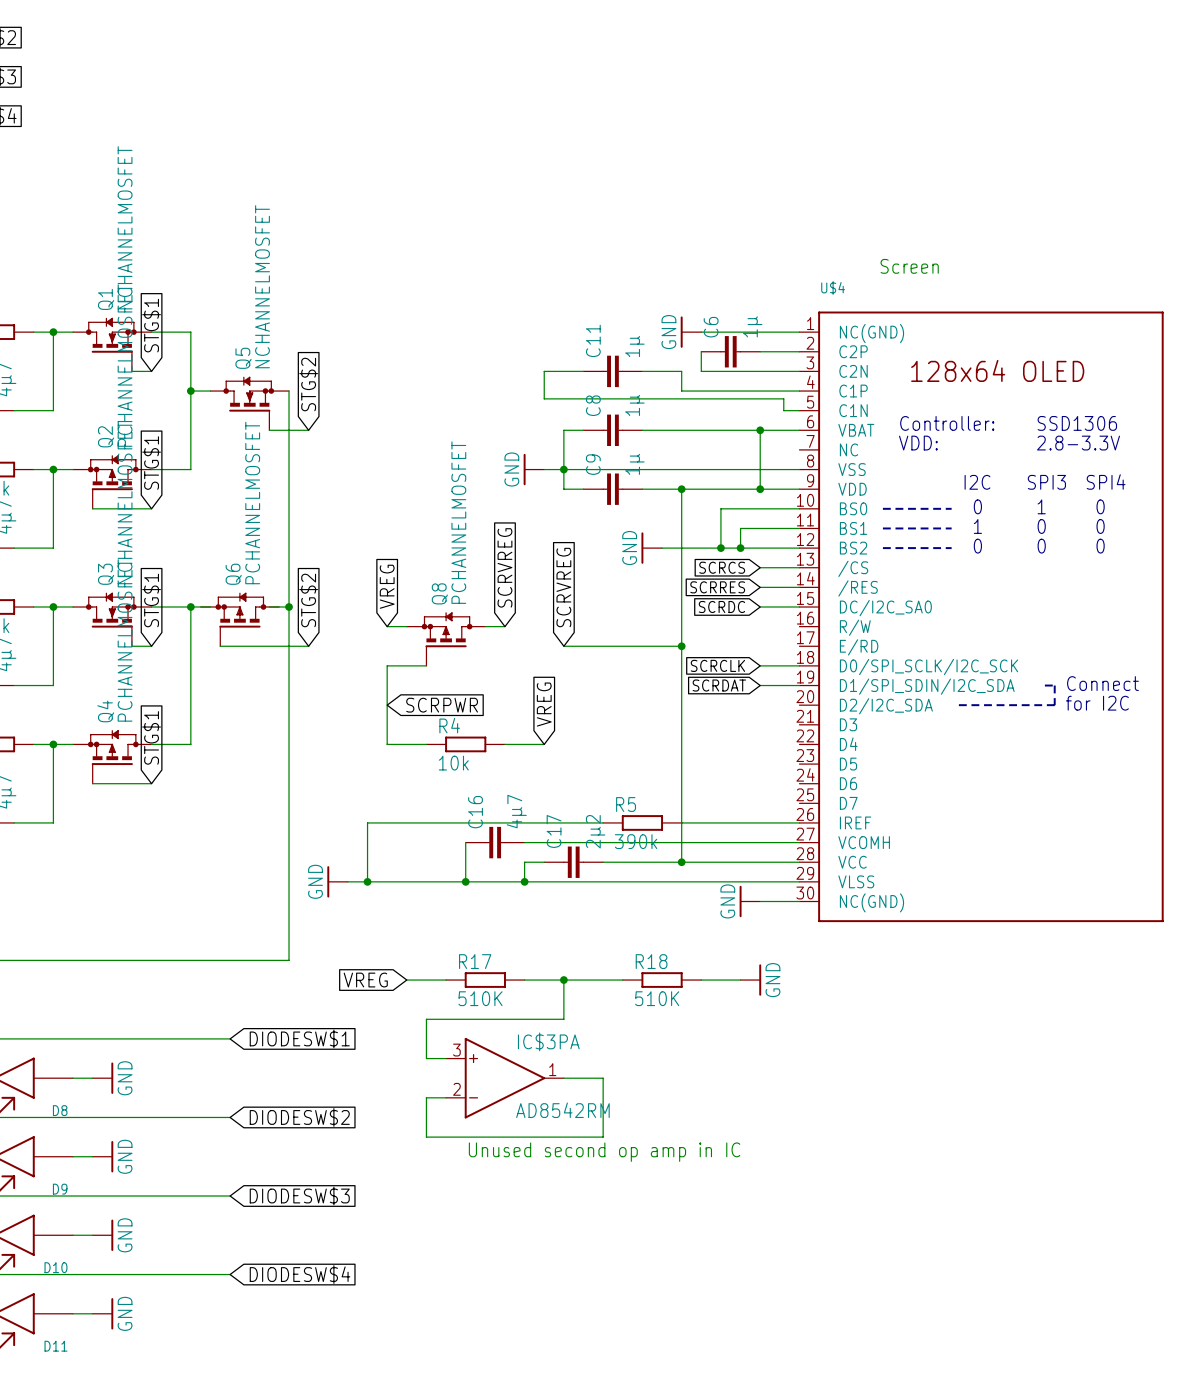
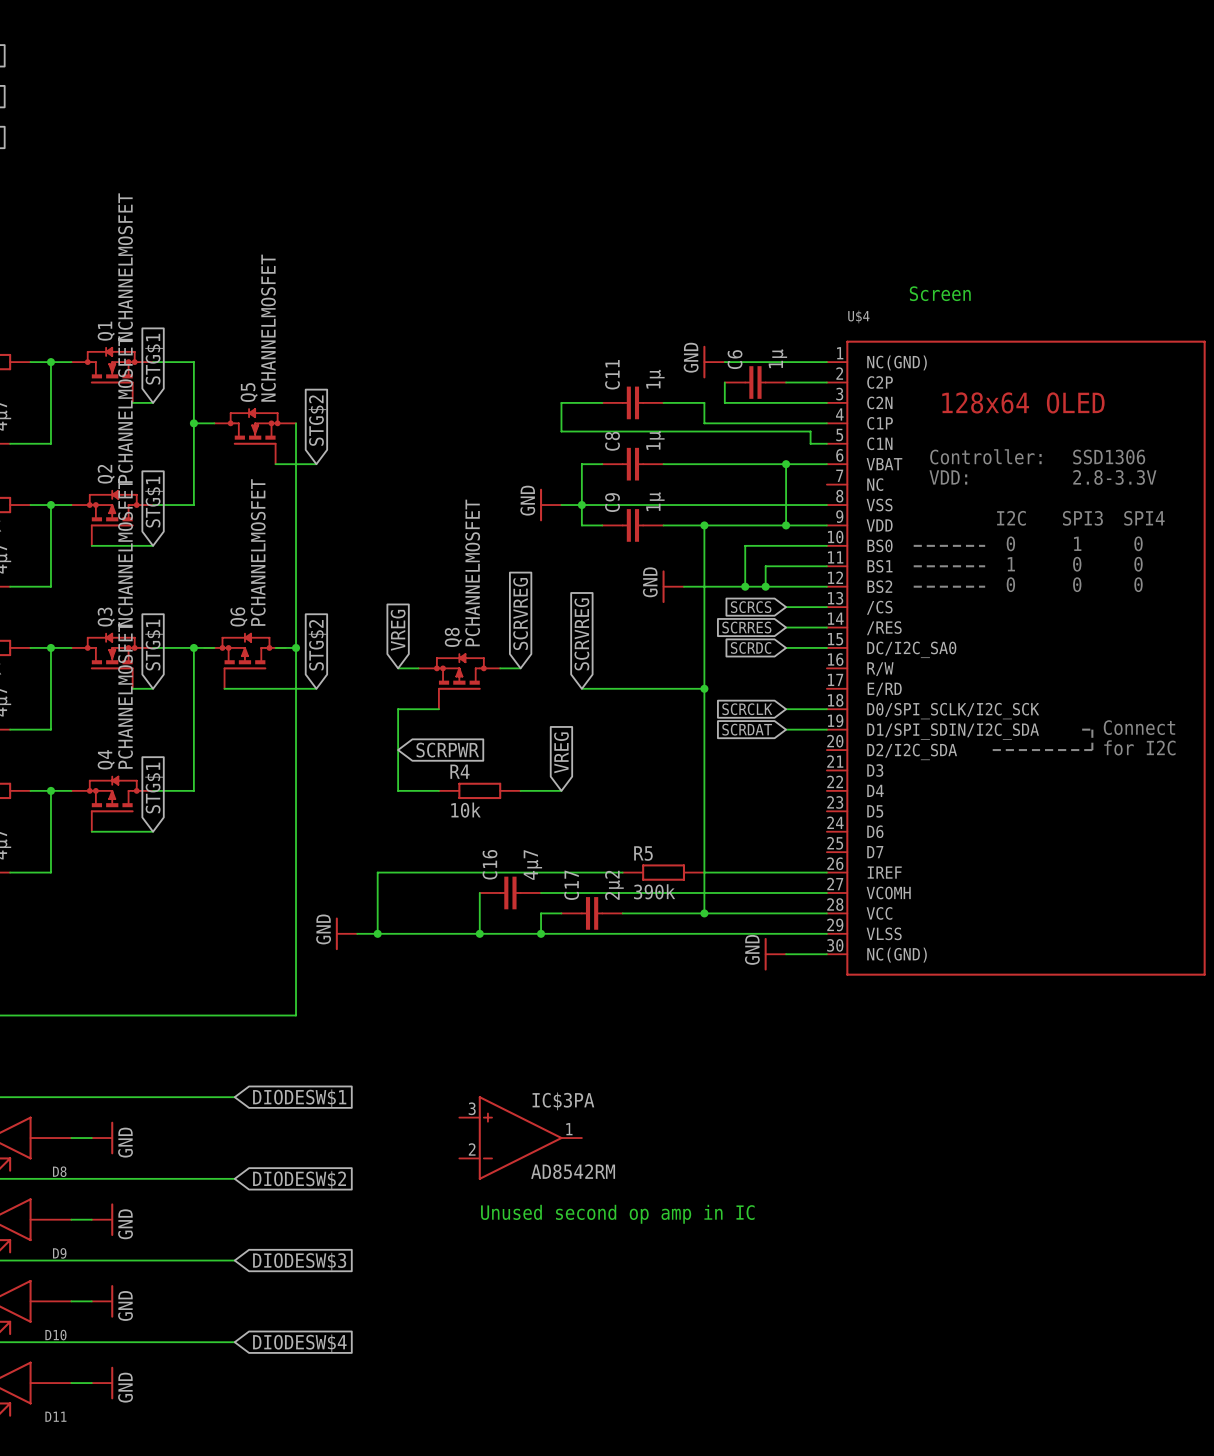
global label: VREG (365, 980) -> none
wire: (406, 980) (446, 980) -> none
R17: 510K (485, 980) -> none
wire: (524, 980) (622, 980) -> none
wire: (563, 980) (563, 1019) (426, 1019) (426, 1058) (446, 1058) -> none
junction: (563, 980) -> none
R18: 510K (662, 980) -> none
wire: (701, 980) (740, 980) -> none
power symbol: GND (750, 980) -> none
wire: (563, 1078) (603, 1078) (603, 1137) (426, 1137) (426, 1097) (446, 1097) -> none

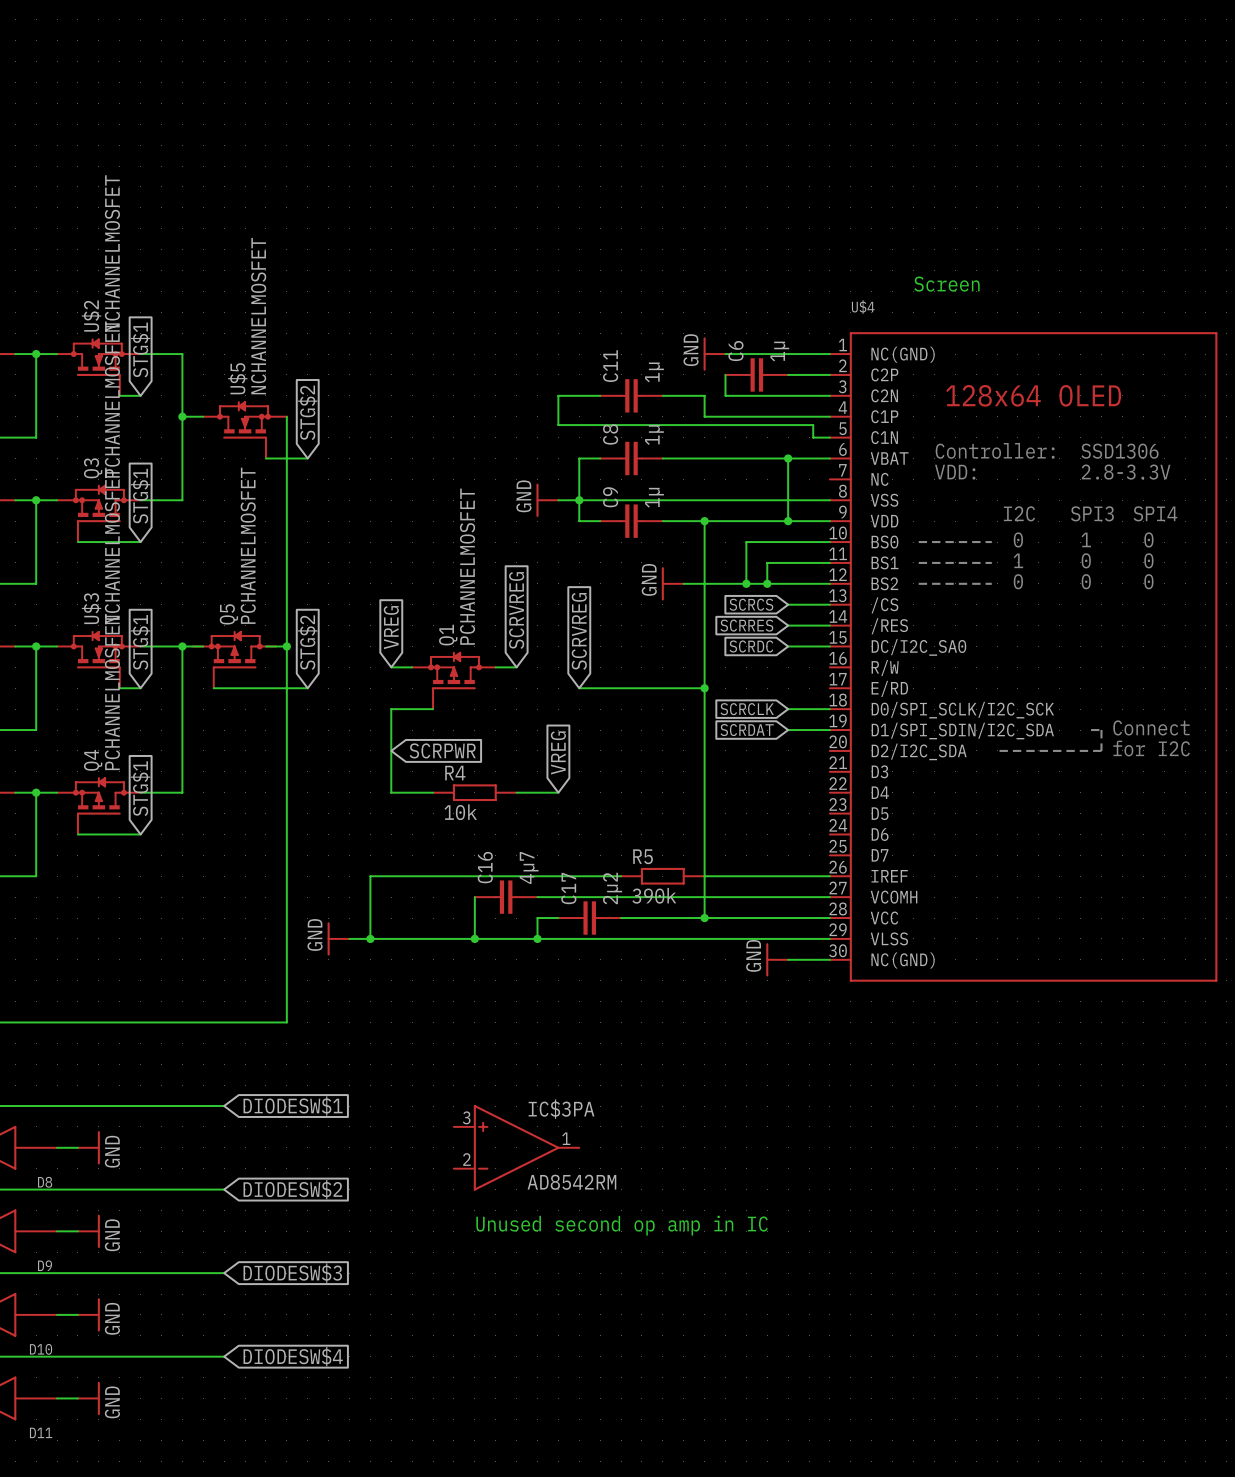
Q1 name: Q1 (106, 331) -> U$2 (91, 316)
Q5 name: Q5 (249, 392) -> U$5 (237, 378)
Q2 name: Q2 (106, 474) -> Q3 (93, 468)
Q6 name: Q6 (238, 616) -> Q5 (228, 614)
Q3 name: Q3 (106, 617) -> U$3 (91, 608)
Q8 name: Q8 (453, 637) -> Q1 (448, 635)

